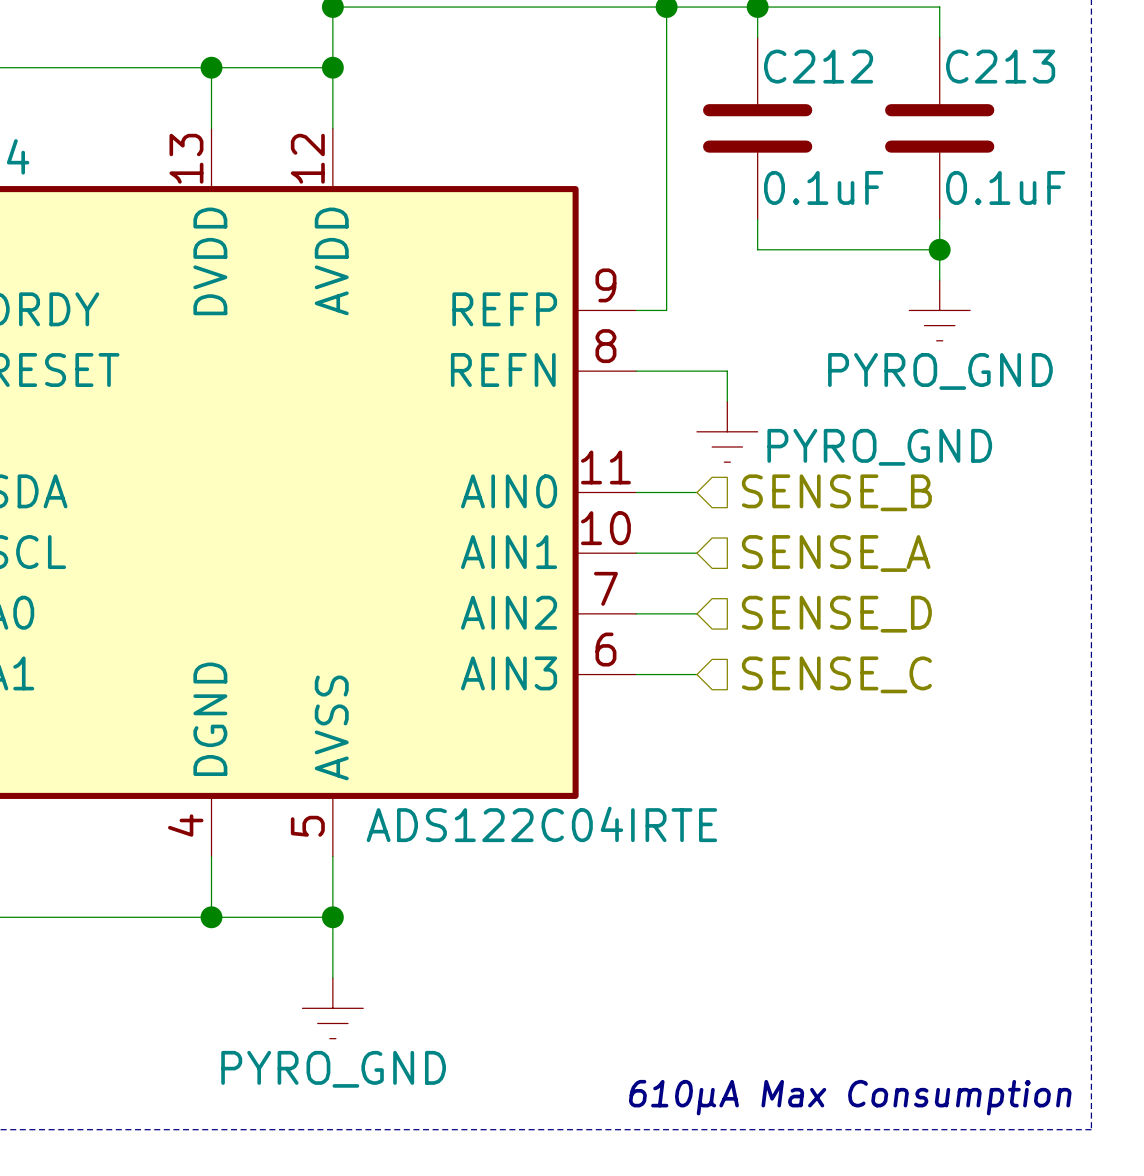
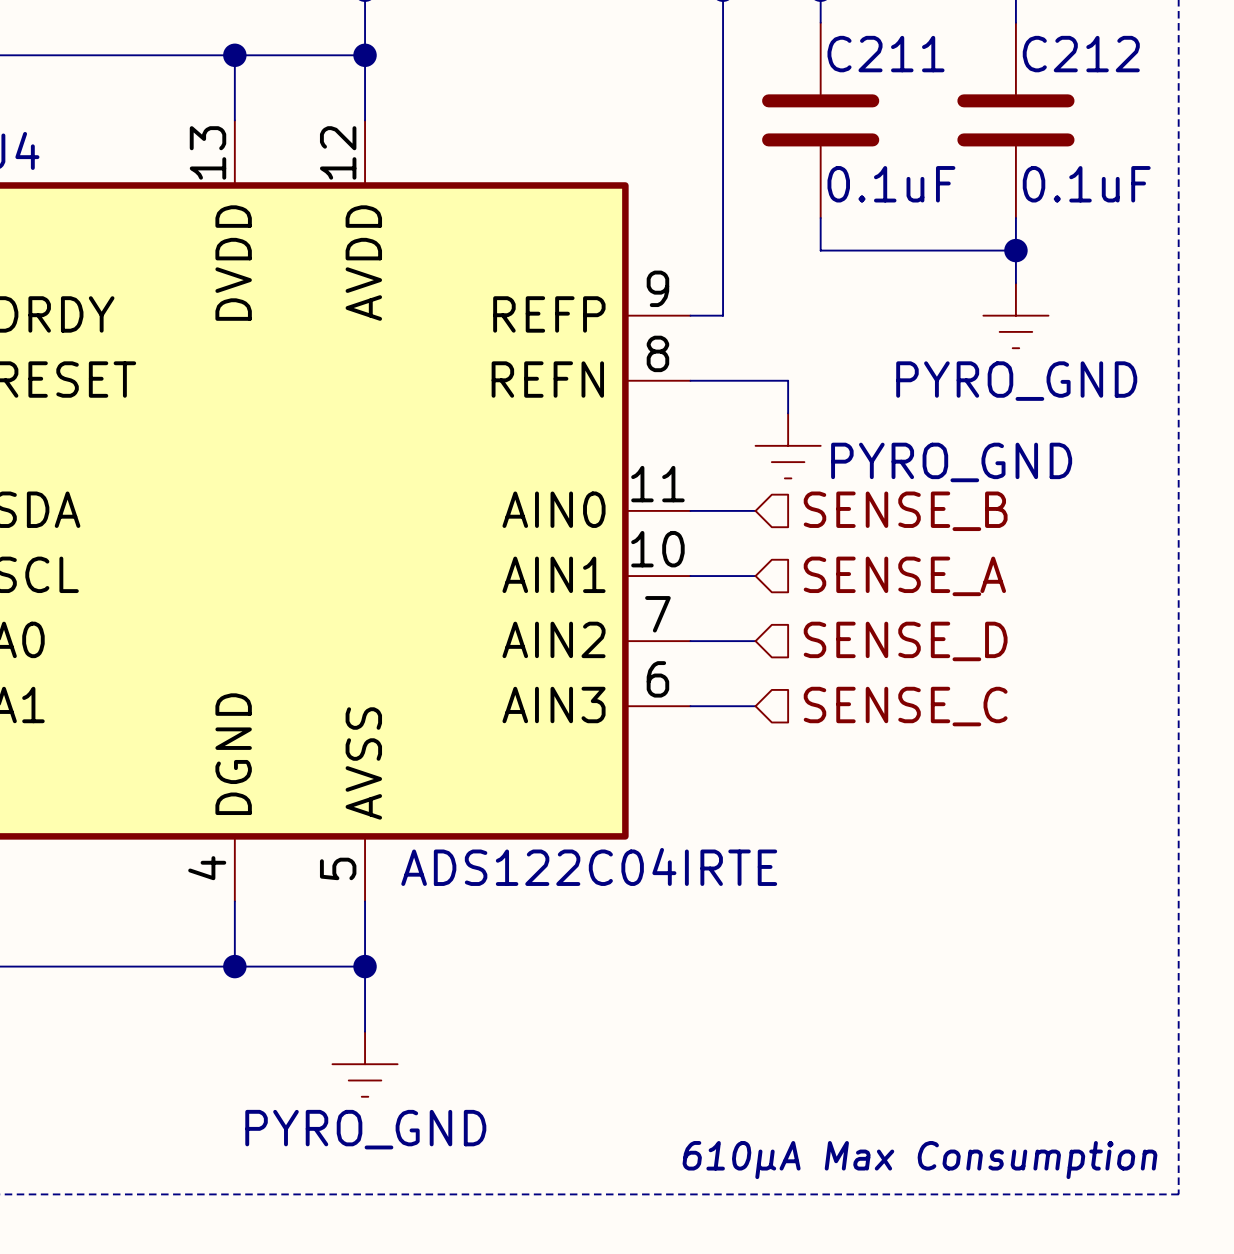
C212 name: C212 (818, 66) -> C211 (886, 54)
C213 name: C213 (1000, 66) -> C212 (1081, 54)

